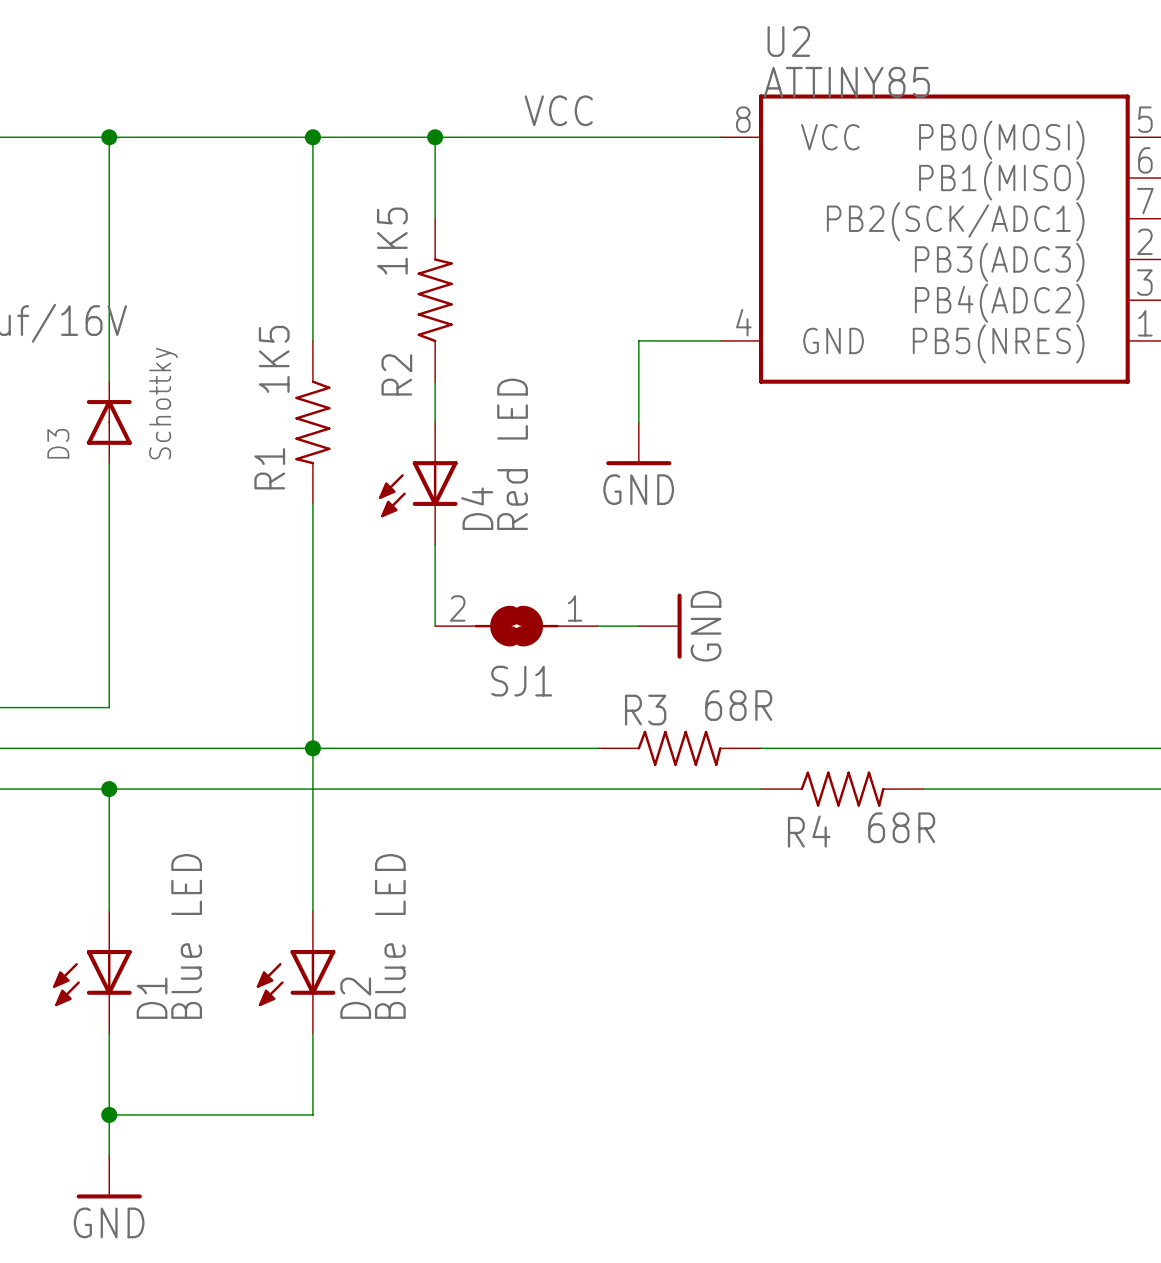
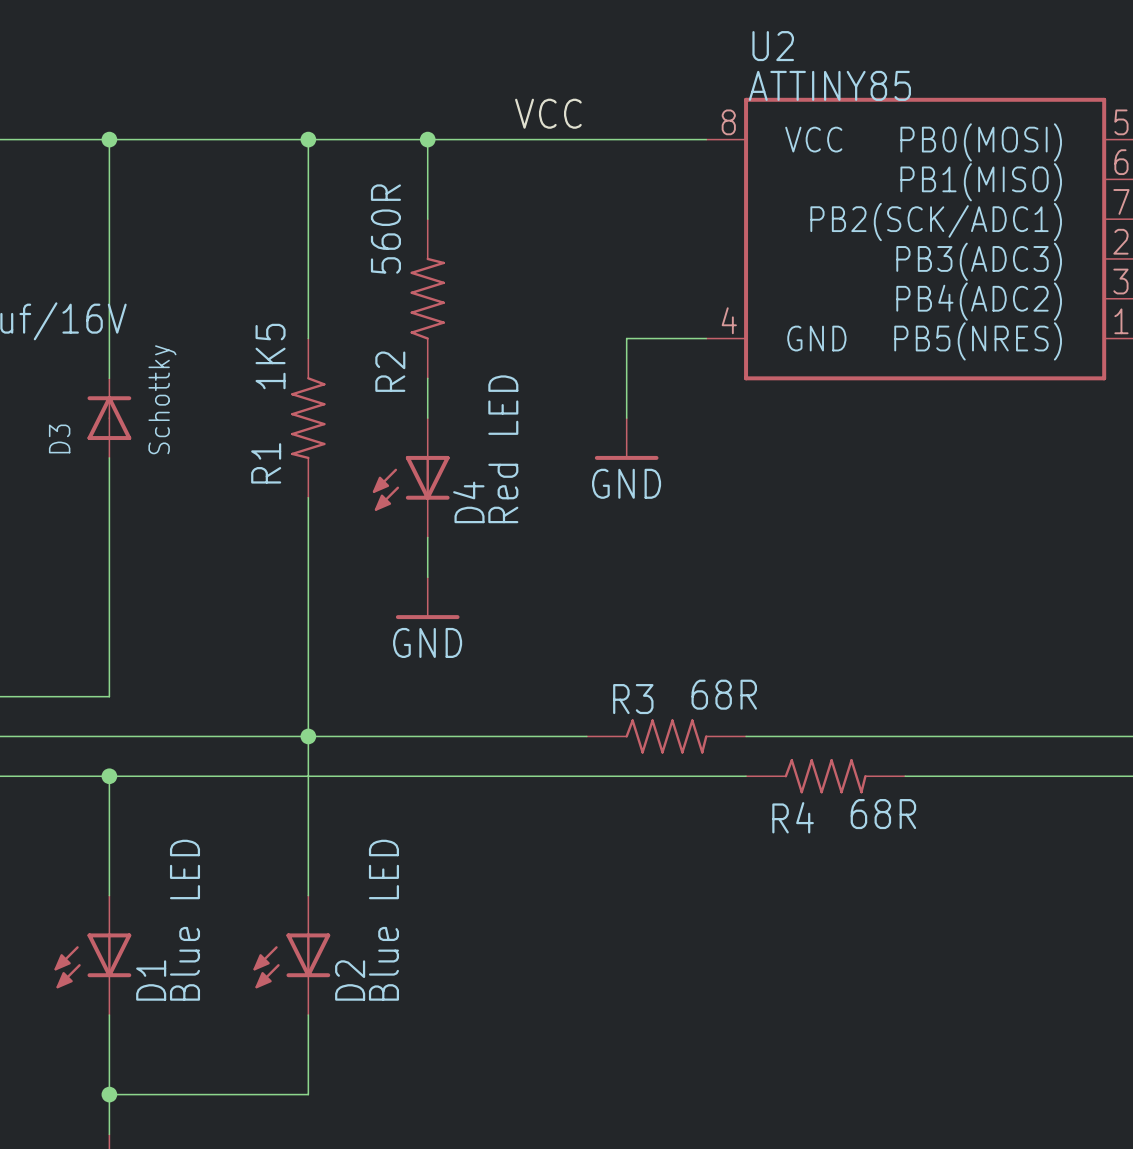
R2 value: 1K5 (392, 241) -> 560R (385, 229)
SJ1: (516, 626) -> none
wire: (598, 626) (638, 626) -> none
power symbol position: GND (660, 626) -> GND (427, 598)
power symbol rotation: 0° (679, 626) -> 90° clockwise (427, 617)

